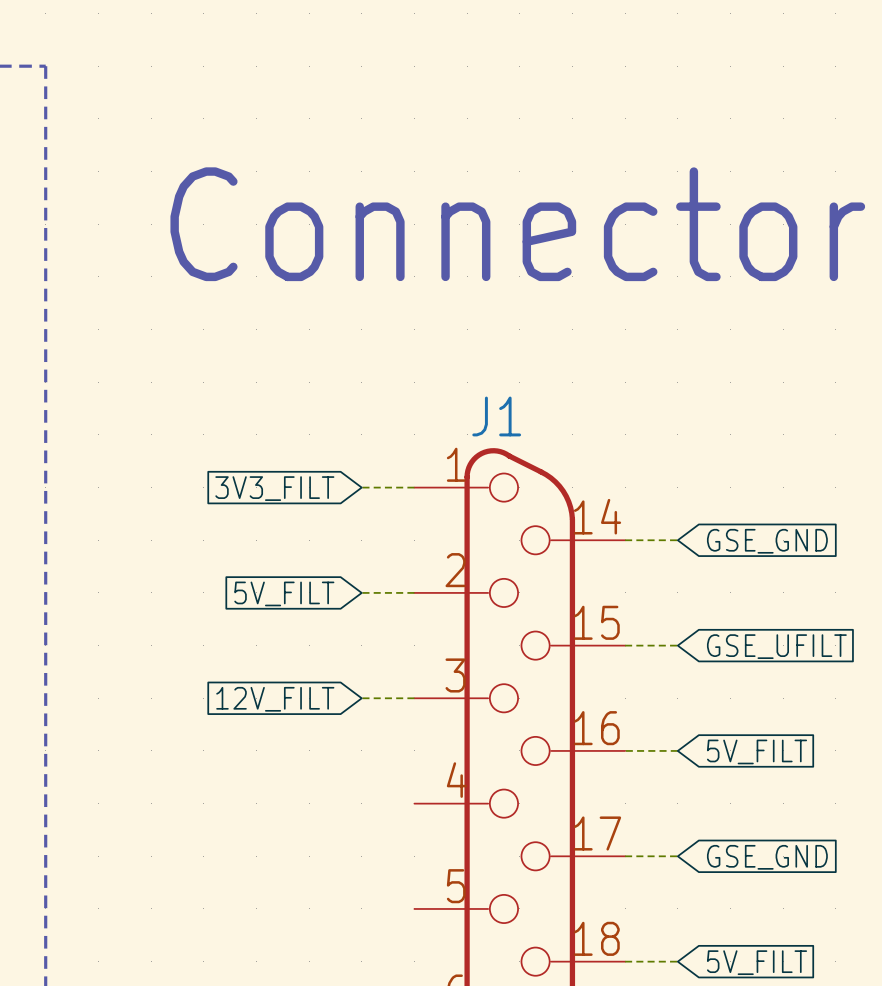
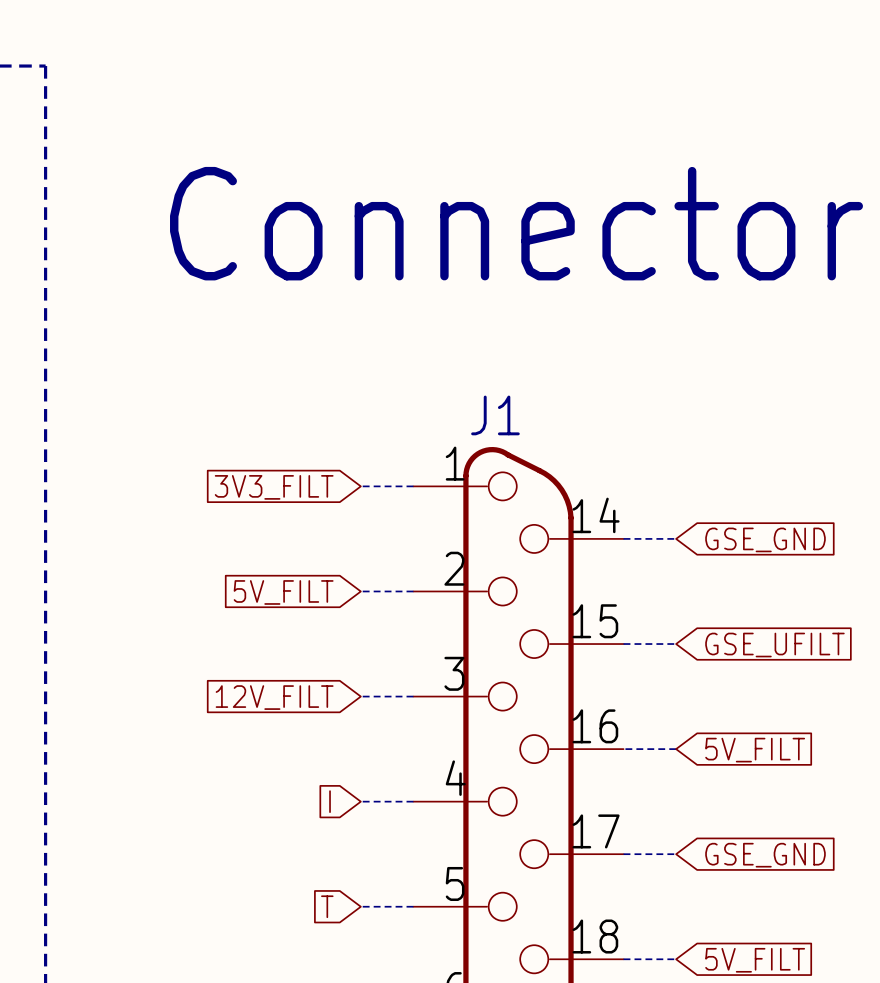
global label: none -> I (330, 801)
wire: none -> (360, 801) (413, 801)
global label: none -> T (327, 906)
wire: none -> (360, 906) (413, 906)

